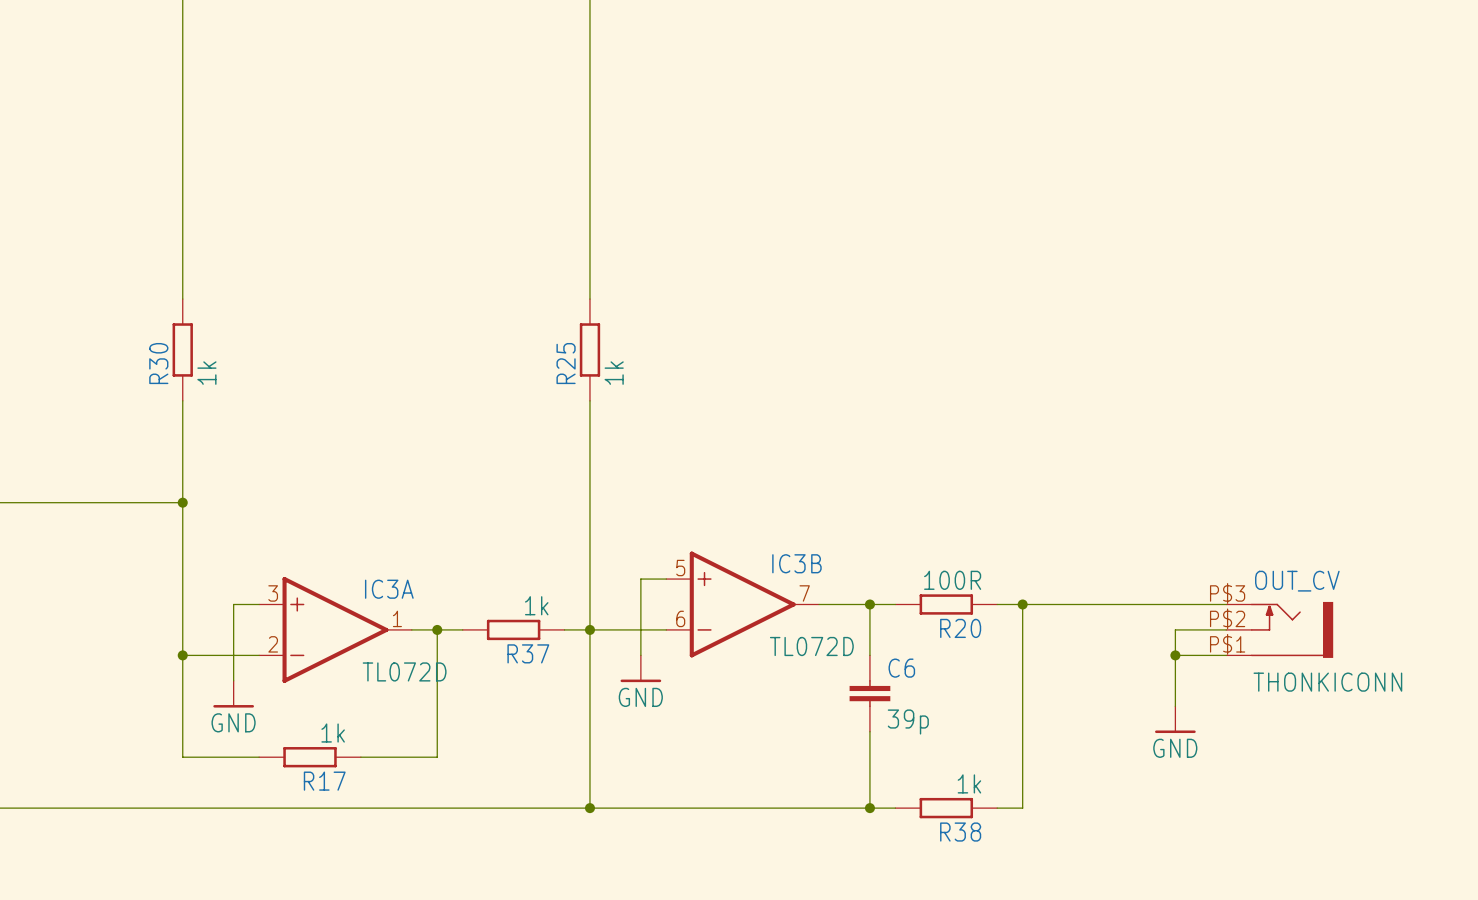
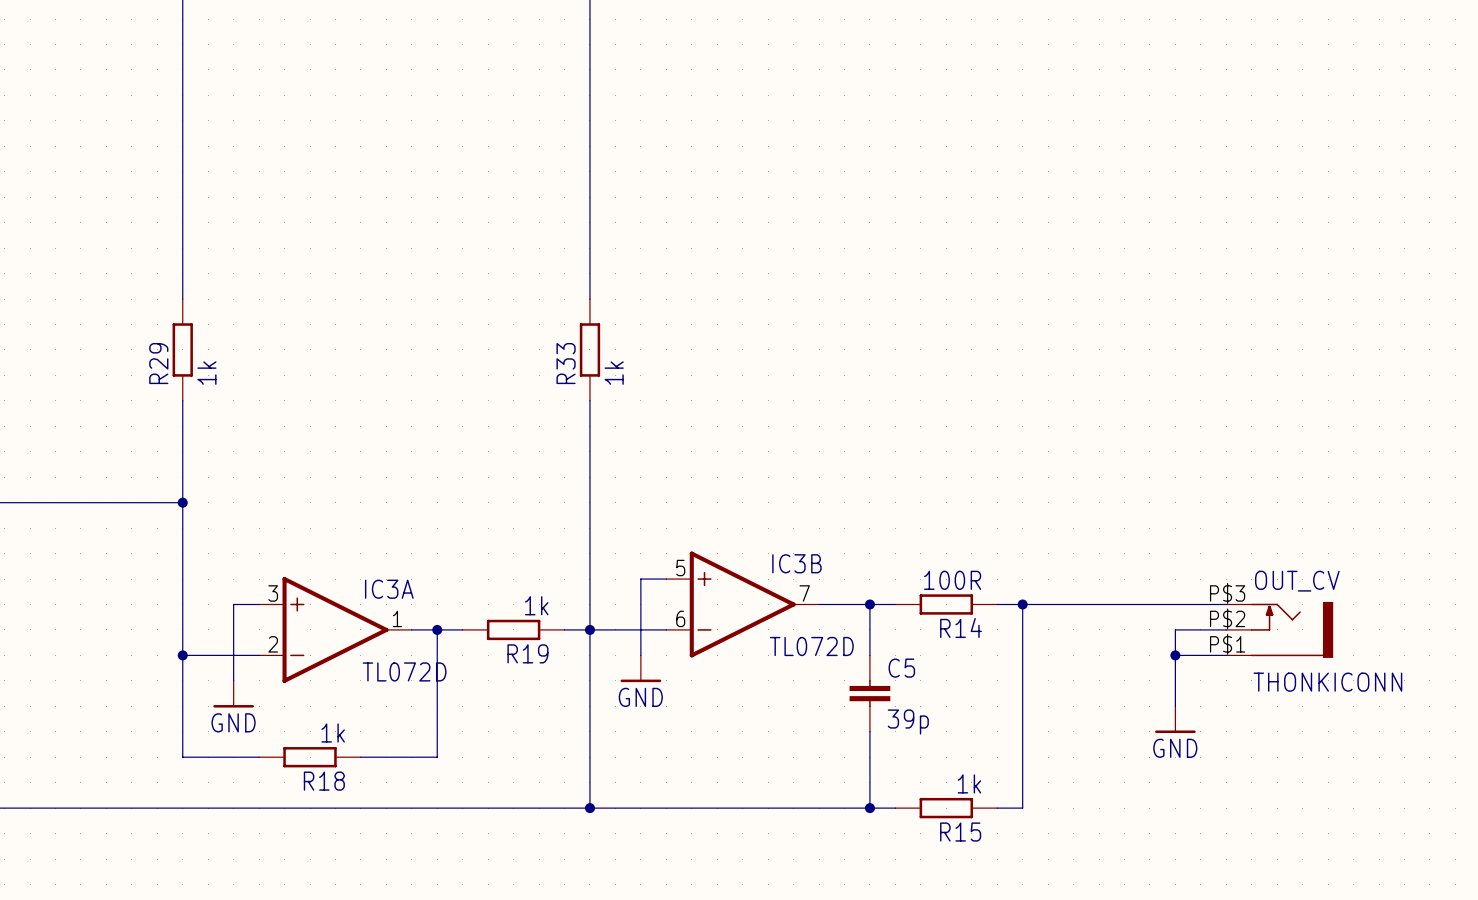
R30 name: R30 (158, 363) -> R29 (158, 363)
R25 name: R25 (566, 363) -> R33 (566, 363)
R20 name: R20 (960, 628) -> R14 (961, 627)
R37 name: R37 (528, 653) -> R19 (527, 653)
C6 name: C6 (901, 668) -> C5 (901, 668)
R17 name: R17 (324, 781) -> R18 (324, 781)
R38 name: R38 (960, 832) -> R15 (960, 832)

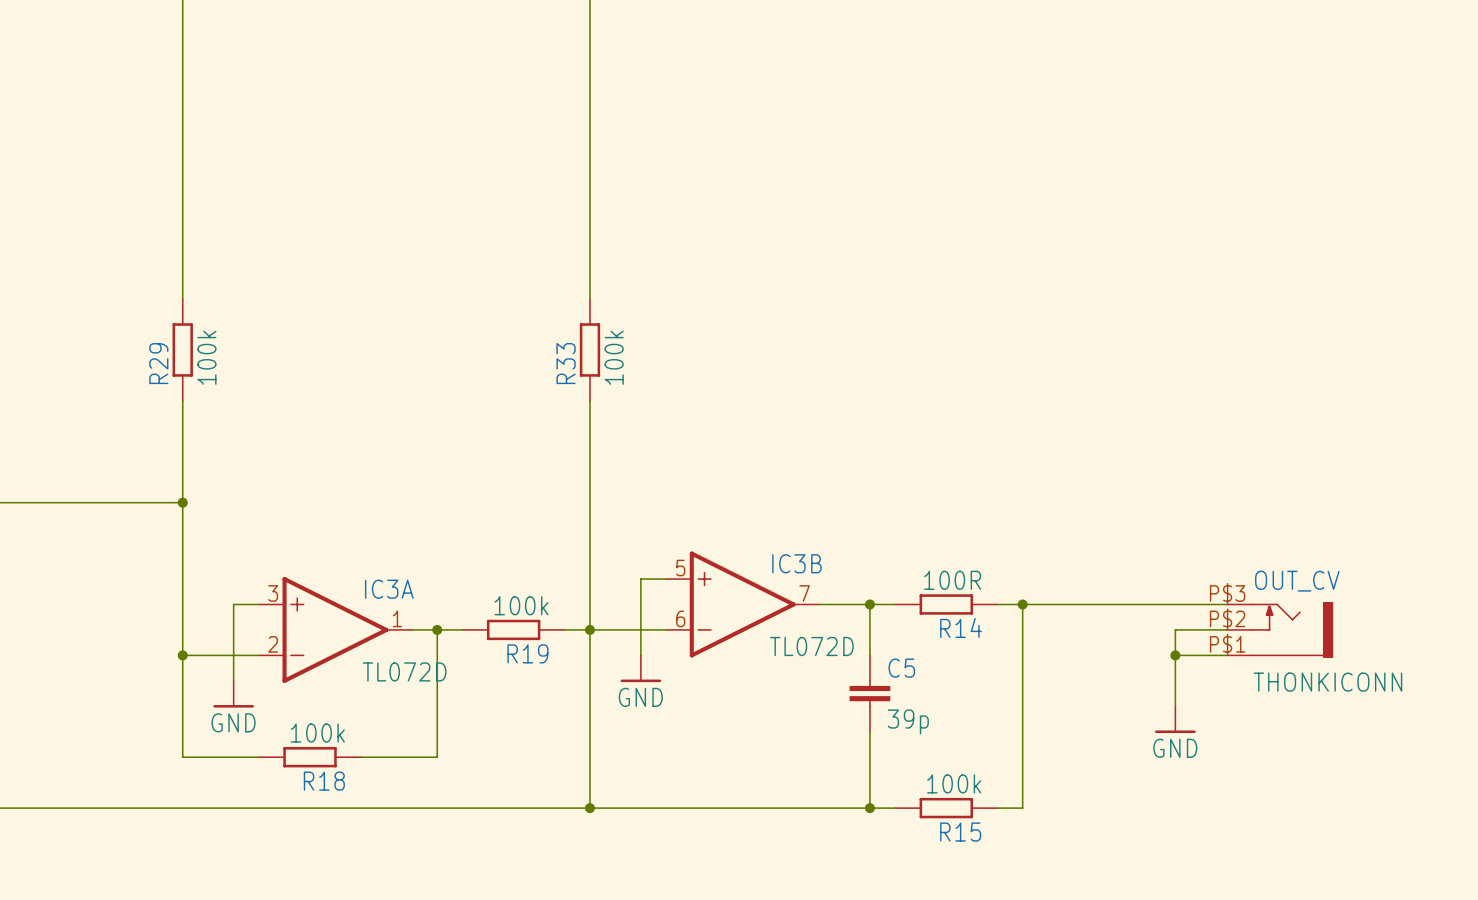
R29 value: 1k (206, 373) -> 100k (206, 357)
R33 value: 1k (614, 373) -> 100k (614, 357)
R19 value: 1k (536, 605) -> 100k (521, 605)
R18 value: 1k (333, 733) -> 100k (317, 733)
R15 value: 1k (969, 783) -> 100k (954, 783)

